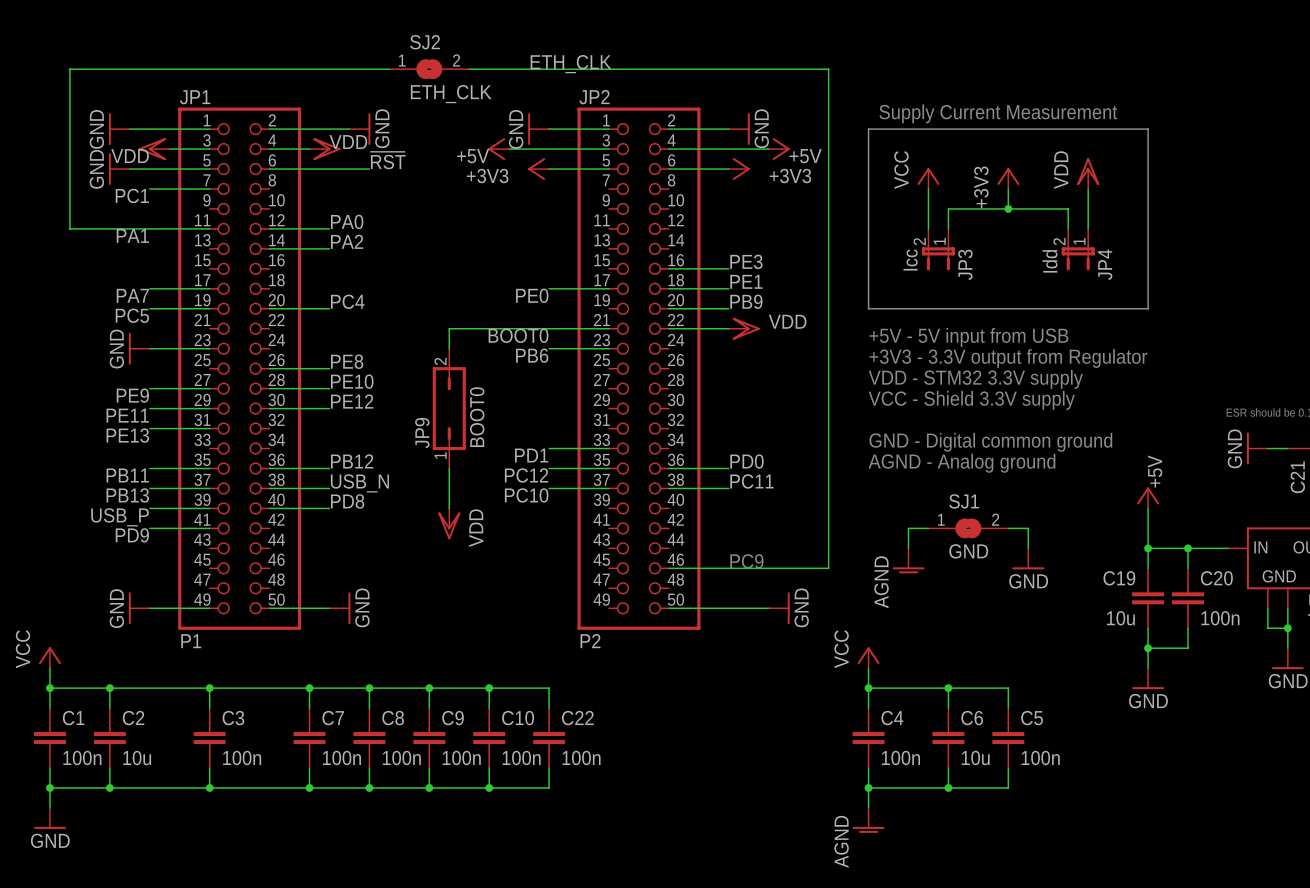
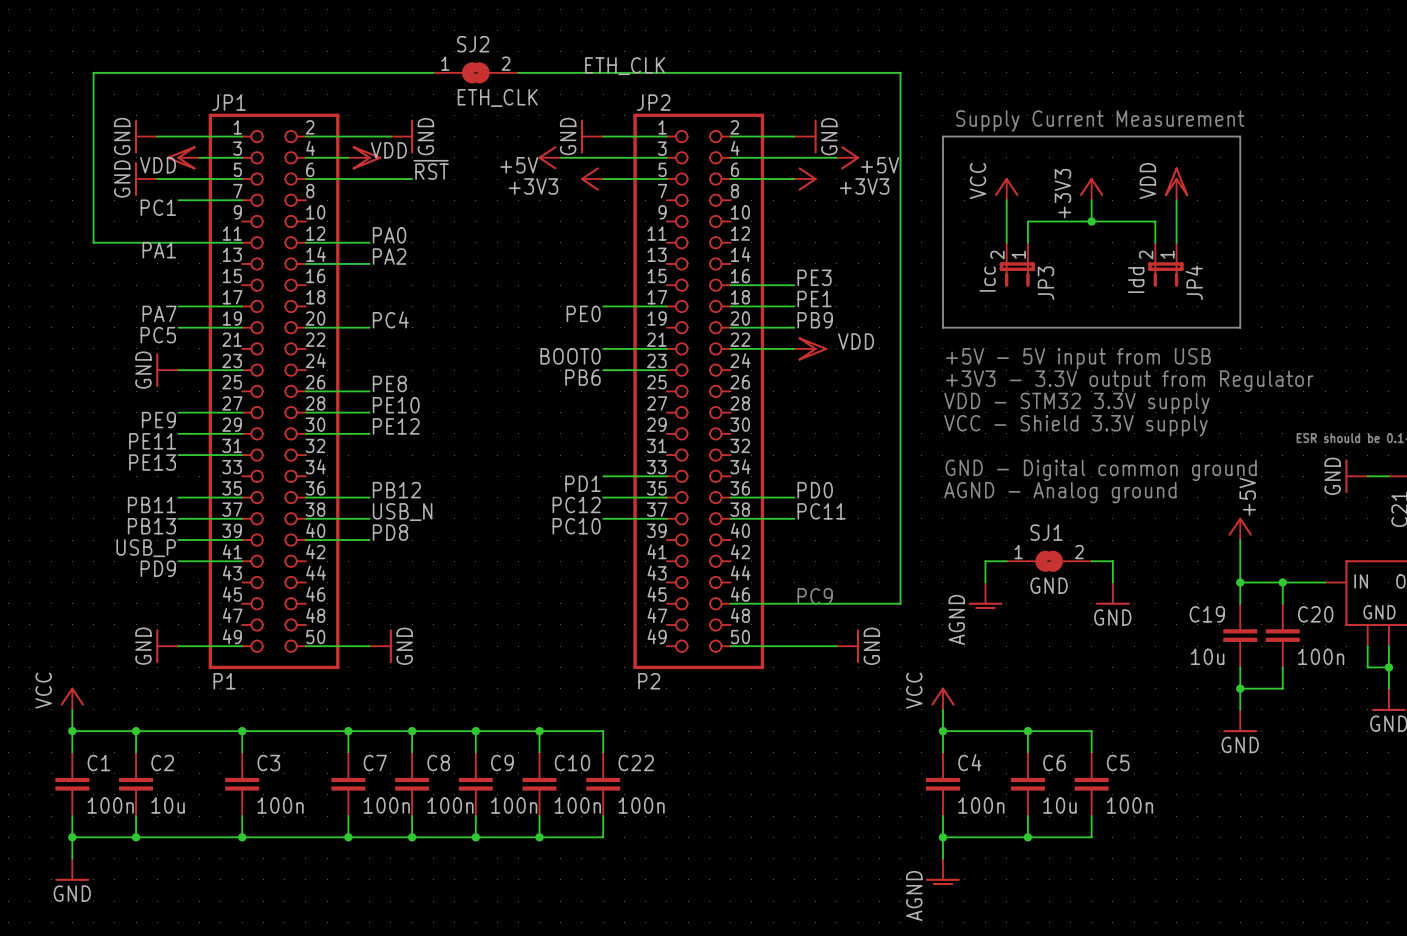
wire: (549, 328) (449, 328) (449, 348) -> none
JP9: BOOT0 (449, 408) -> none
wire: (449, 468) (449, 508) -> none
power symbol: VDD (449, 523) -> none

